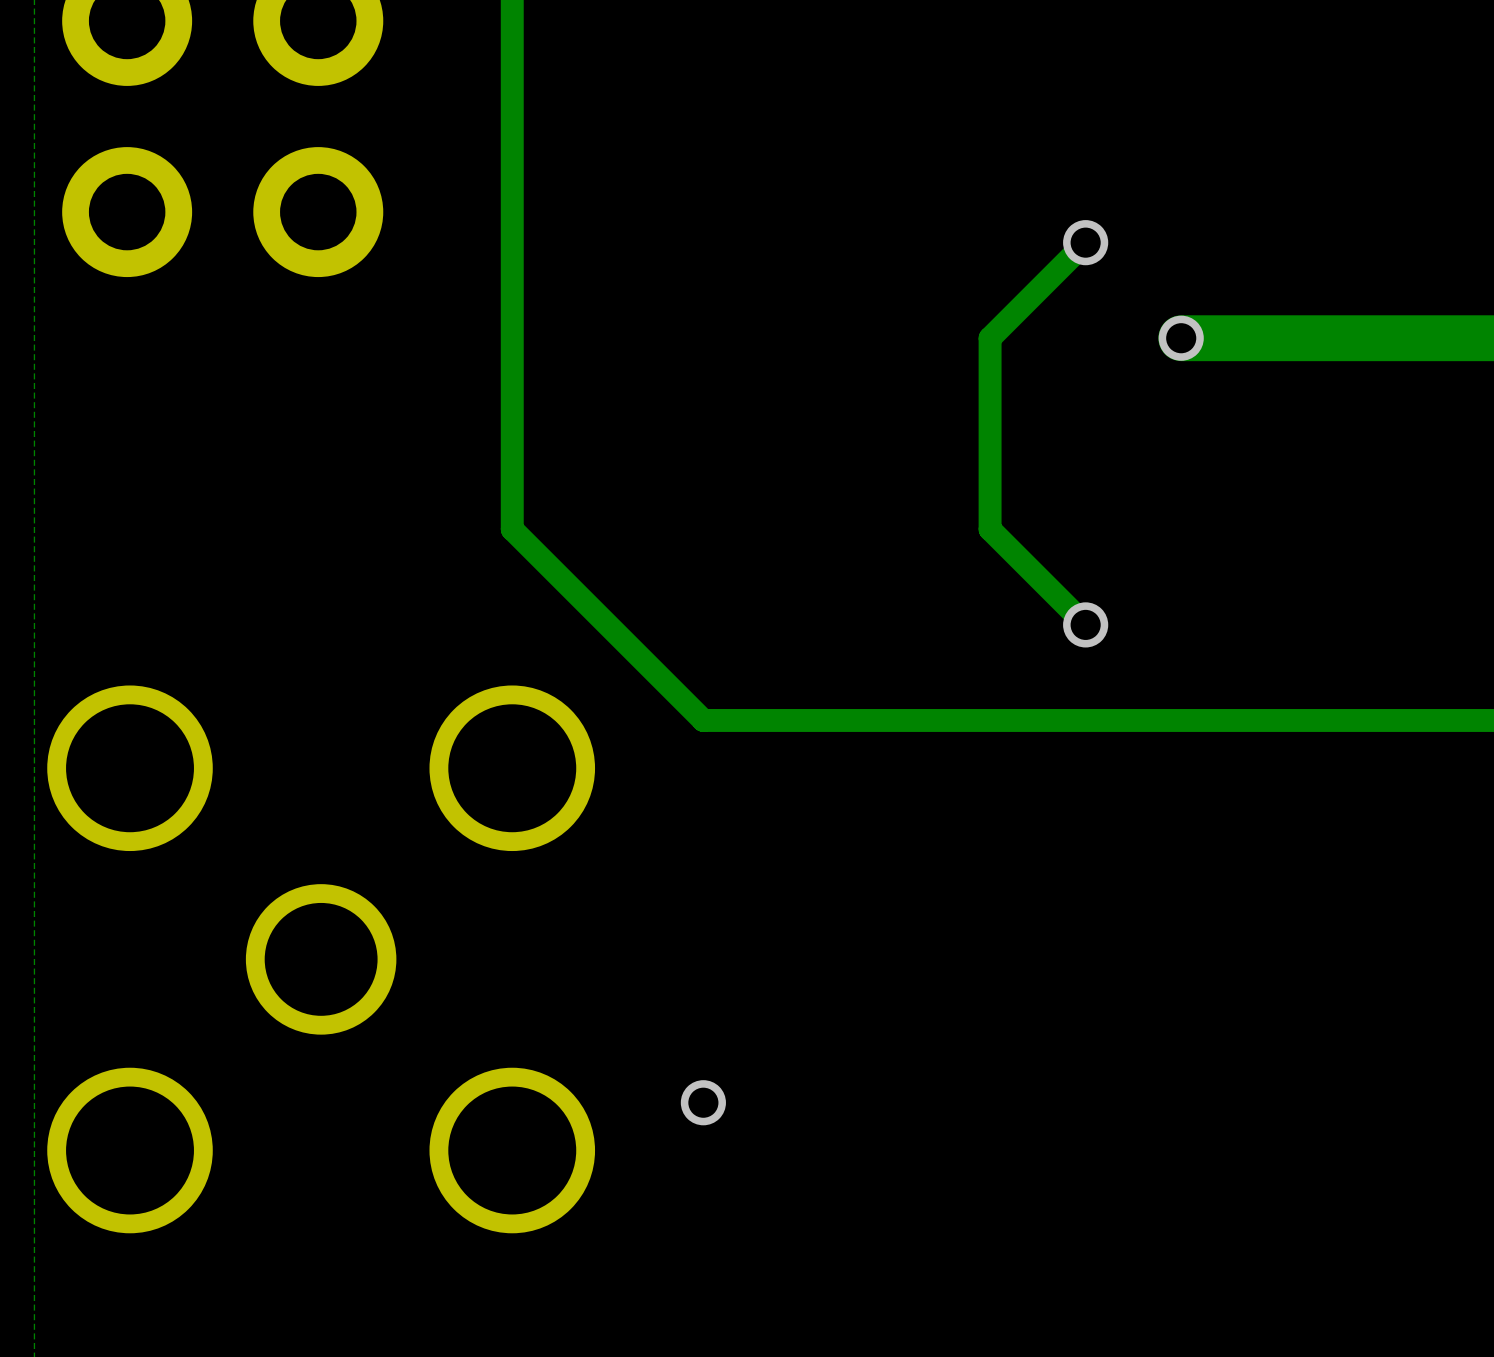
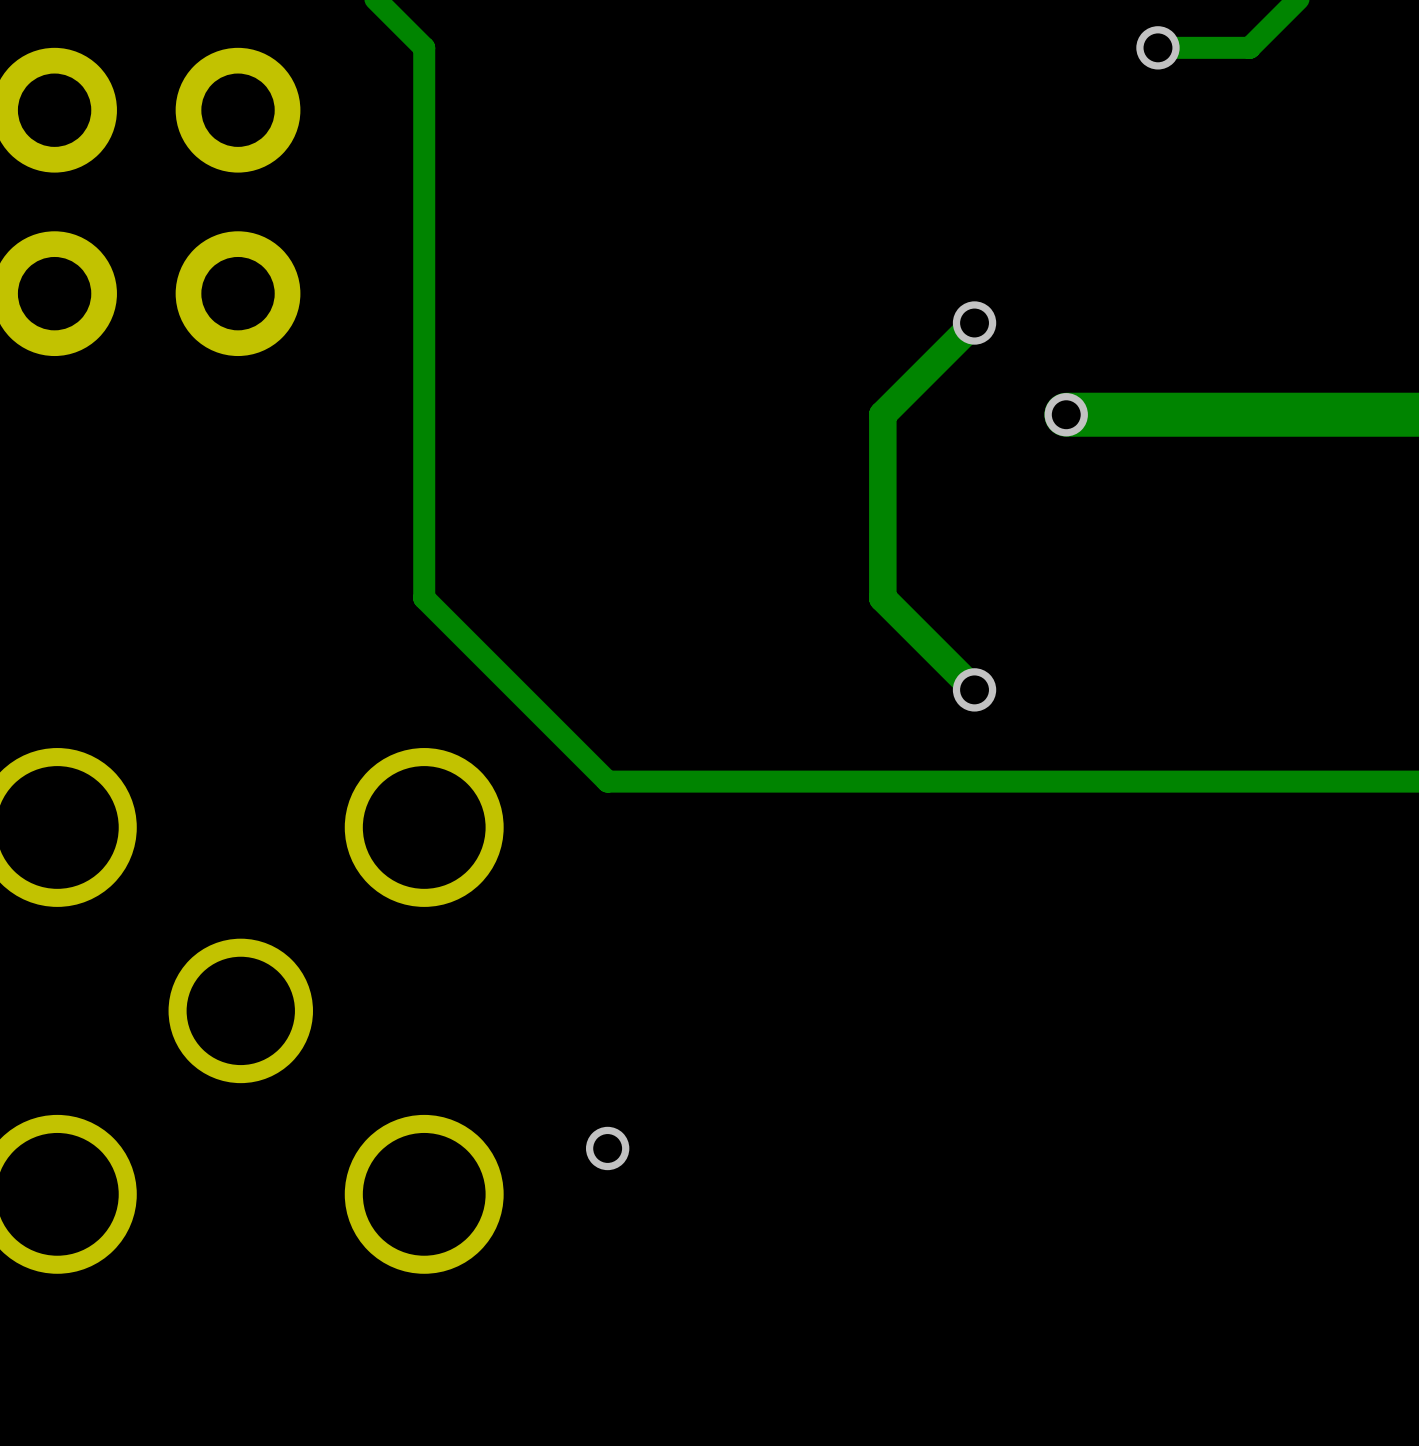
track width: thin (1085, 242) (990, 338) (990, 529) (1085, 624) -> thick (974, 323) (882, 414) (882, 598) (974, 689)

